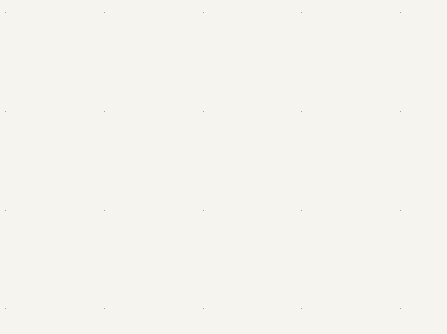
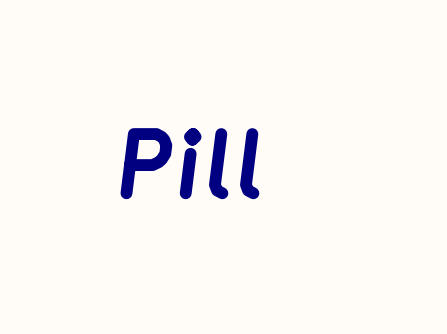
text: none -> Pill (189, 163)

